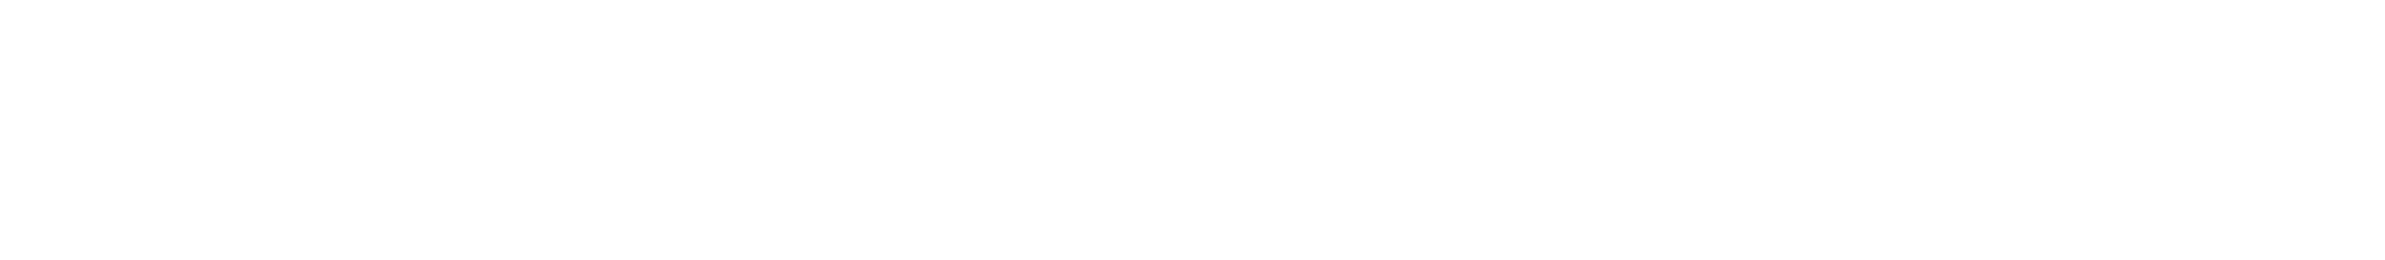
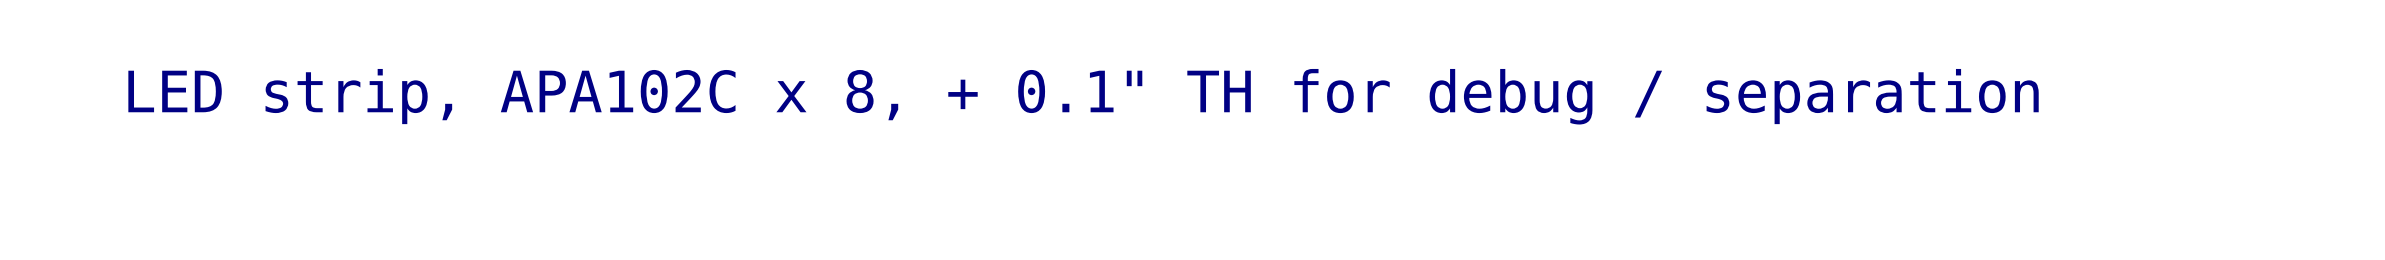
text: none -> LED strip, APA102C x 8, + 0.1" TH for debug / separation (1083, 96)

